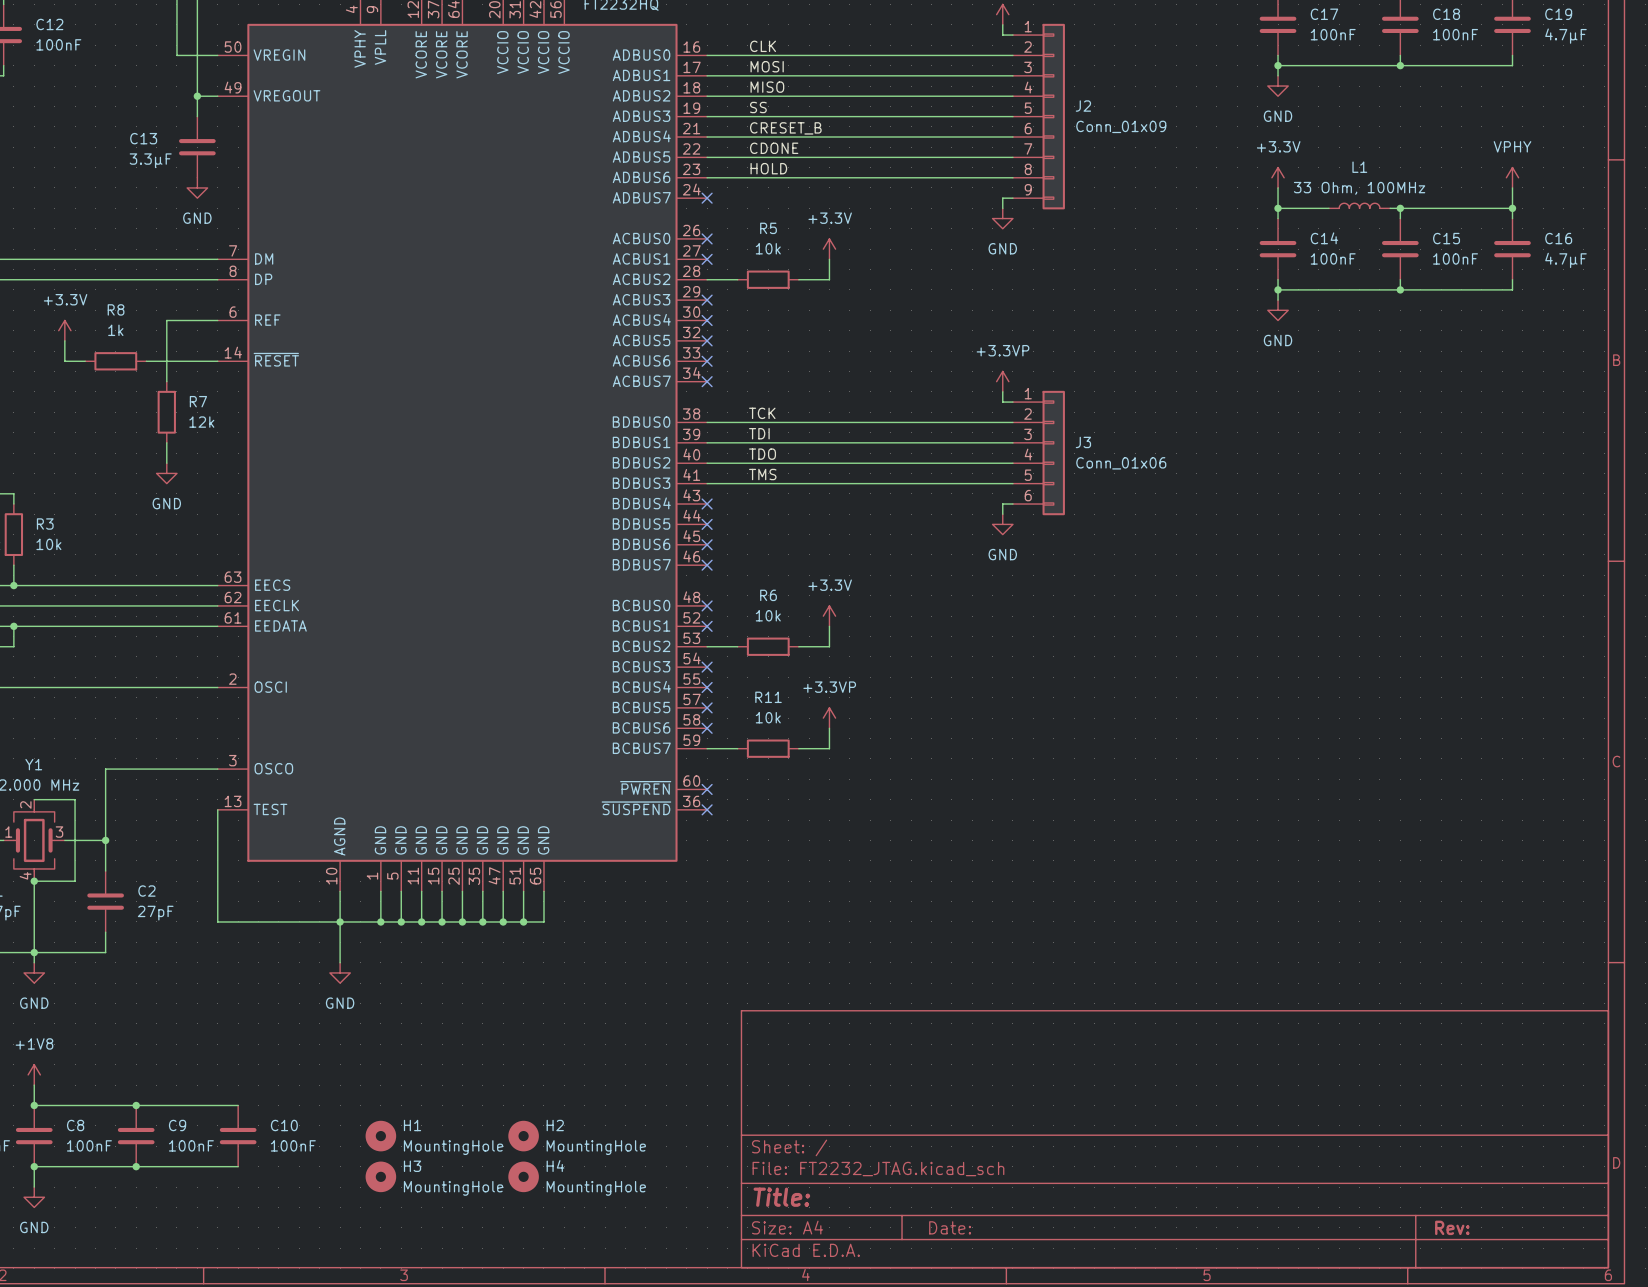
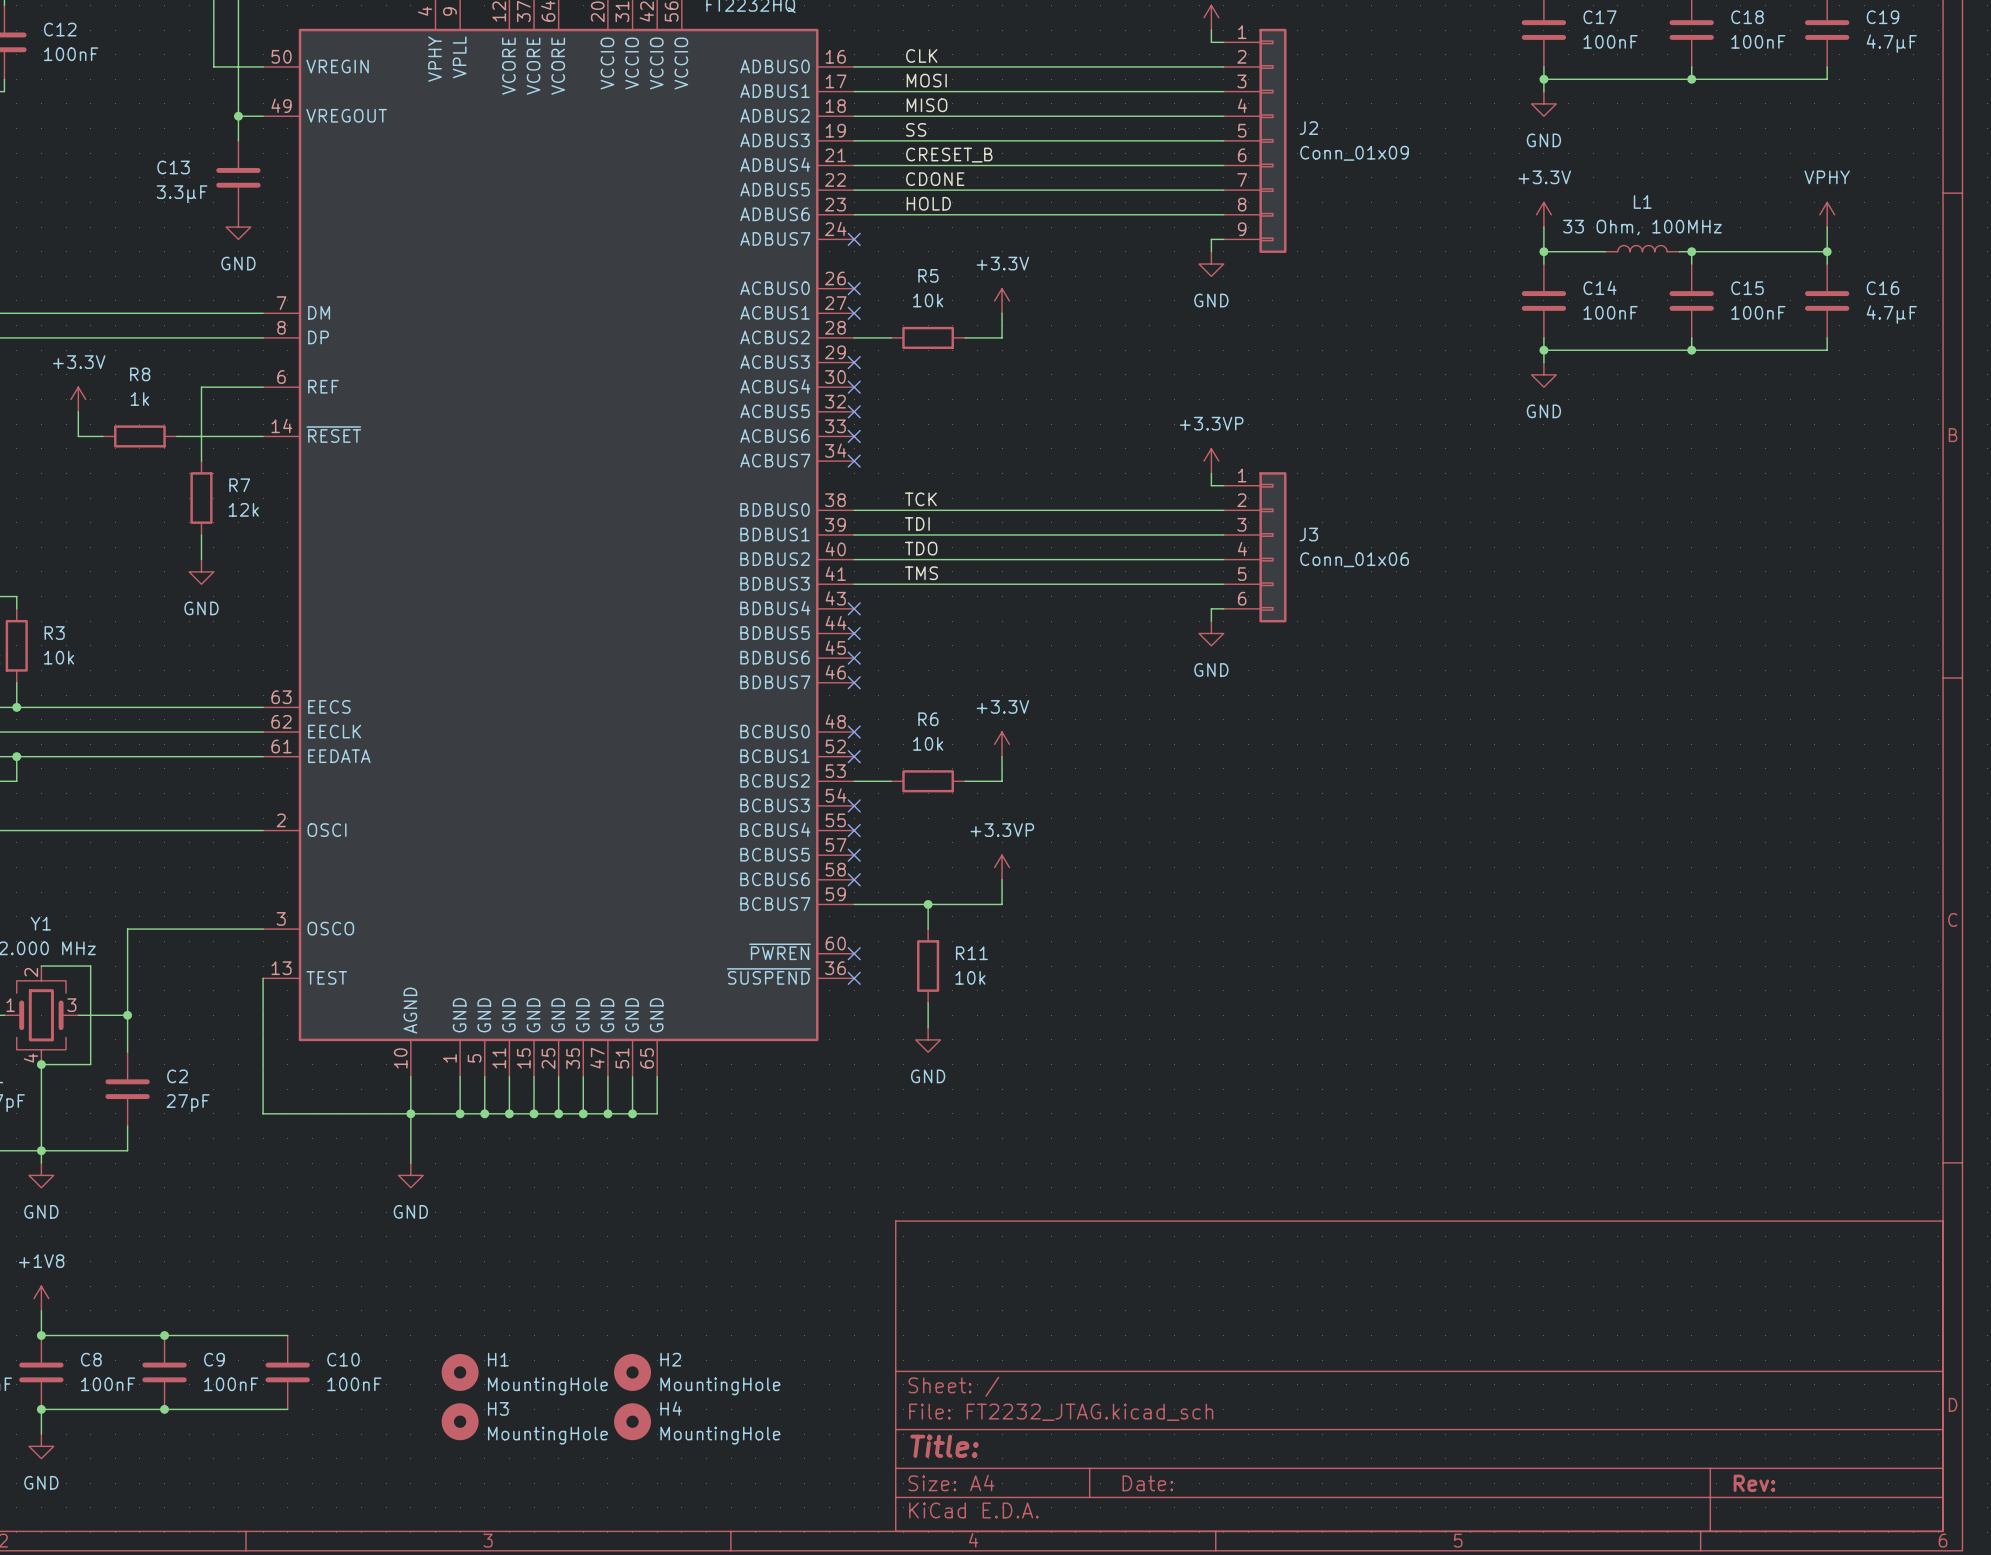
R11 name position: R11 (768, 697) -> R11 (971, 953)
wire: none -> (891, 904) (965, 904)
wire: none -> (928, 904) (928, 929)
R11 rotation: 0° (768, 748) -> 90° clockwise (928, 966)
R11 position: (768, 748) -> (928, 966)
junction: none -> (928, 904)
wire: none -> (928, 1002) (928, 1027)
power symbol: none -> GND (928, 1039)

